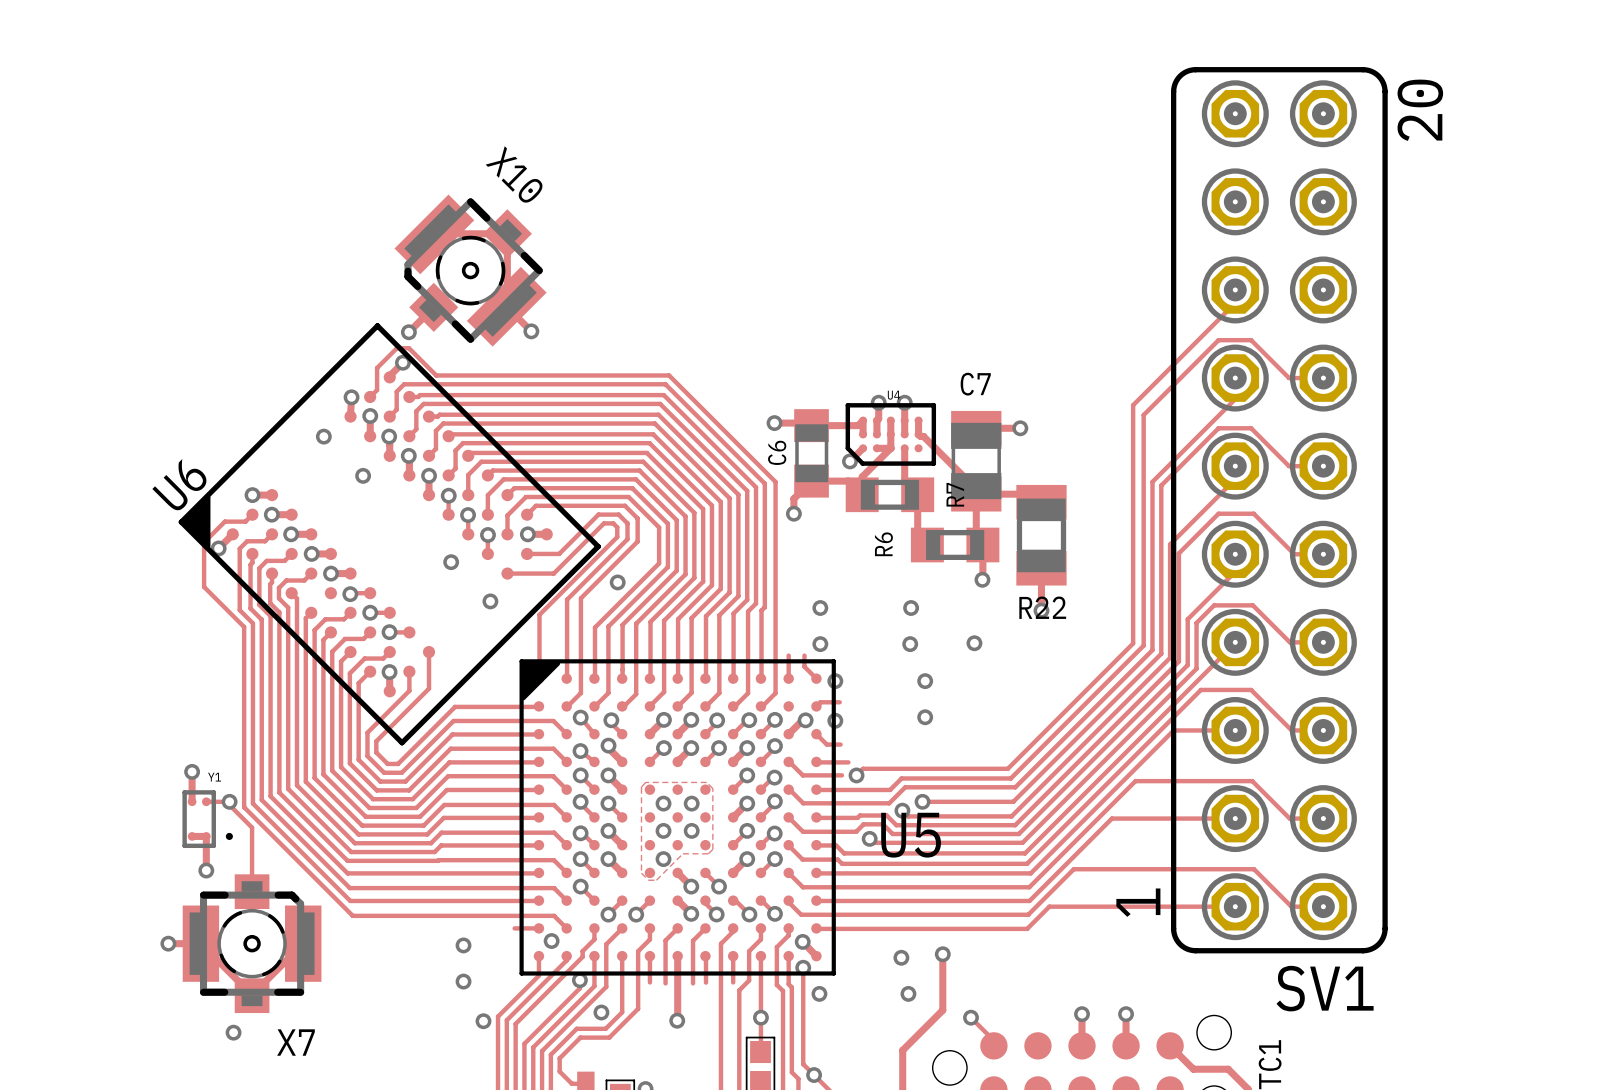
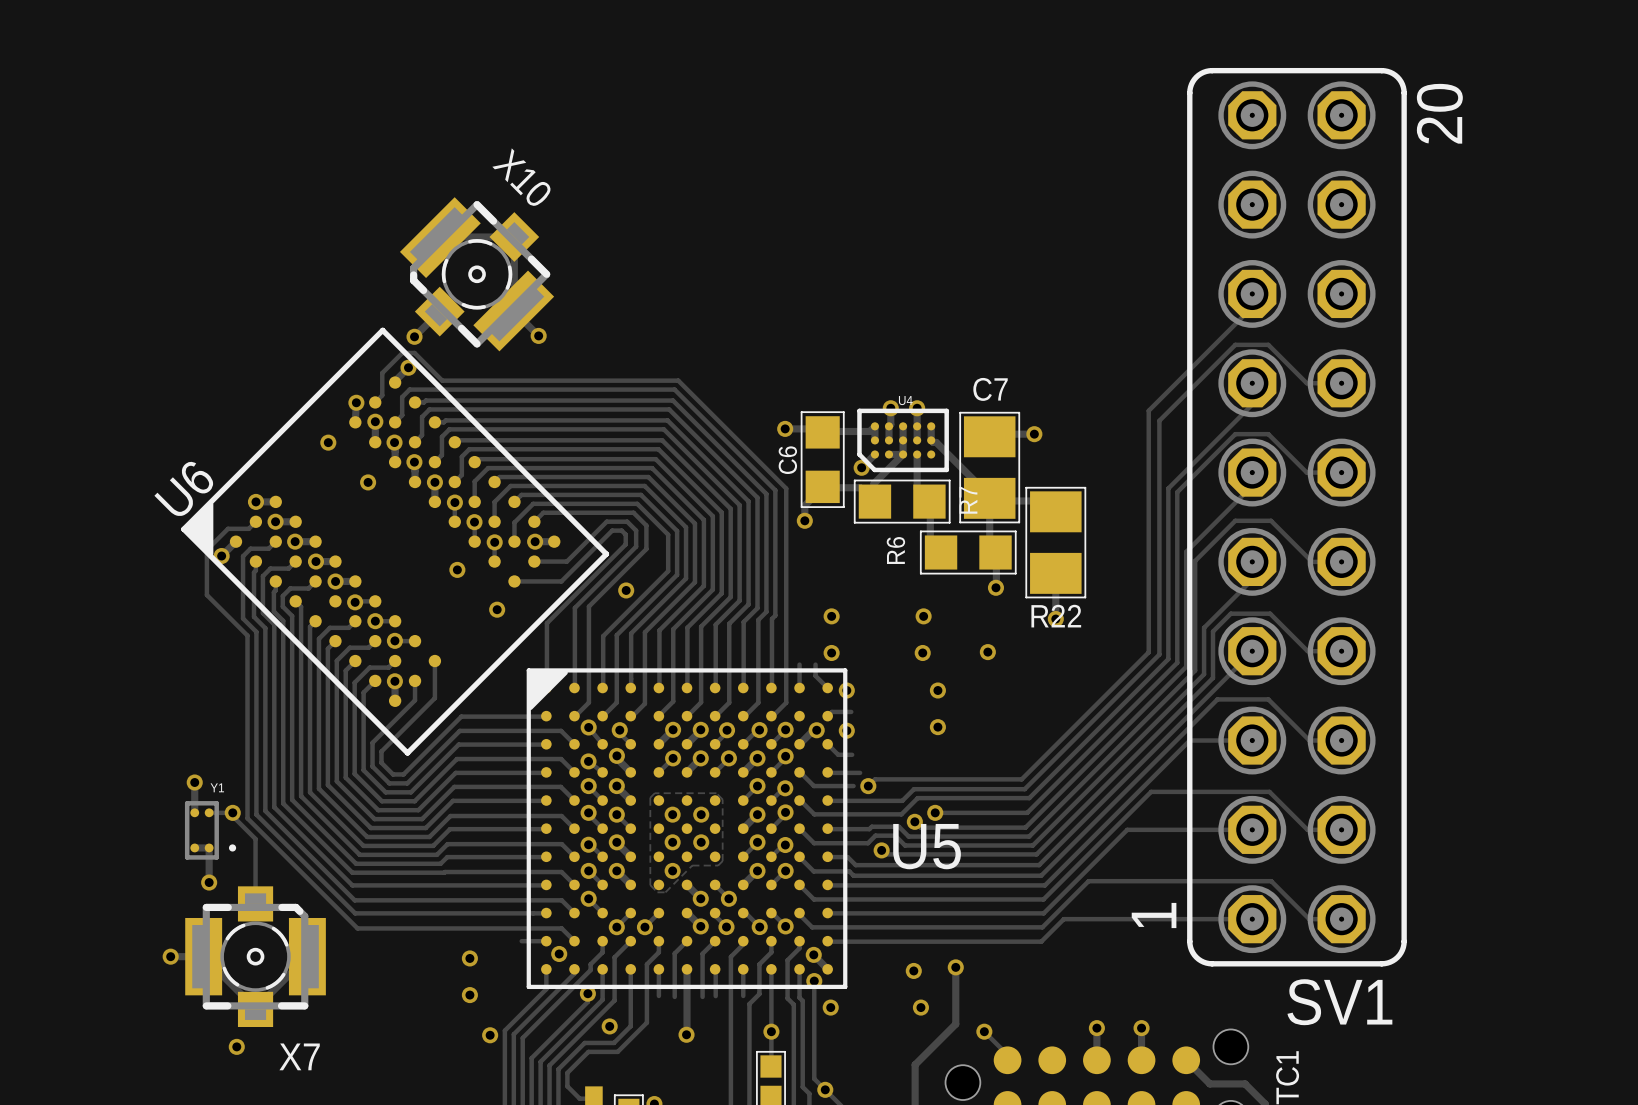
C6 footprint: [794, 409, 829, 498] -> [800, 411, 845, 508]
C7 footprint: [951, 410, 1002, 512] -> [959, 411, 1021, 524]
R7 footprint: [845, 477, 935, 513] -> [853, 479, 951, 524]
R22 footprint: [1016, 484, 1067, 586] -> [1025, 486, 1087, 599]
R6 footprint: [910, 527, 1000, 563] -> [919, 530, 1017, 575]

